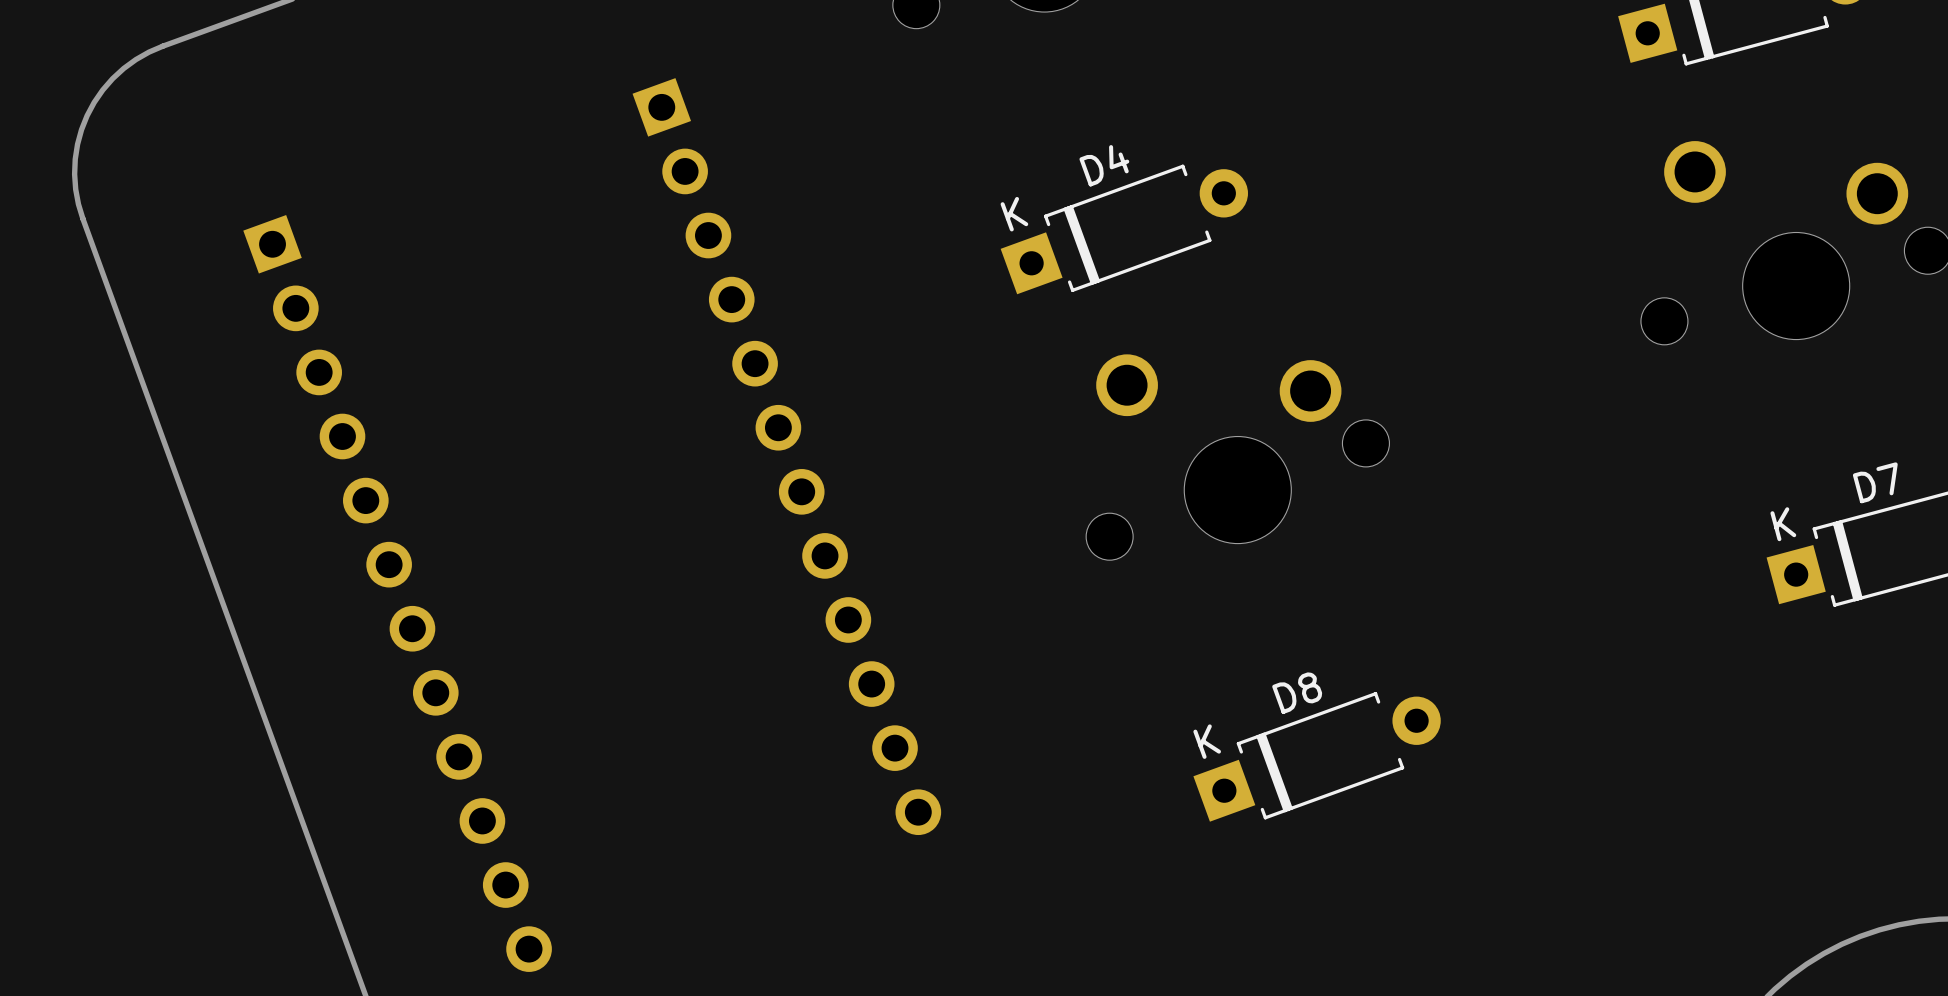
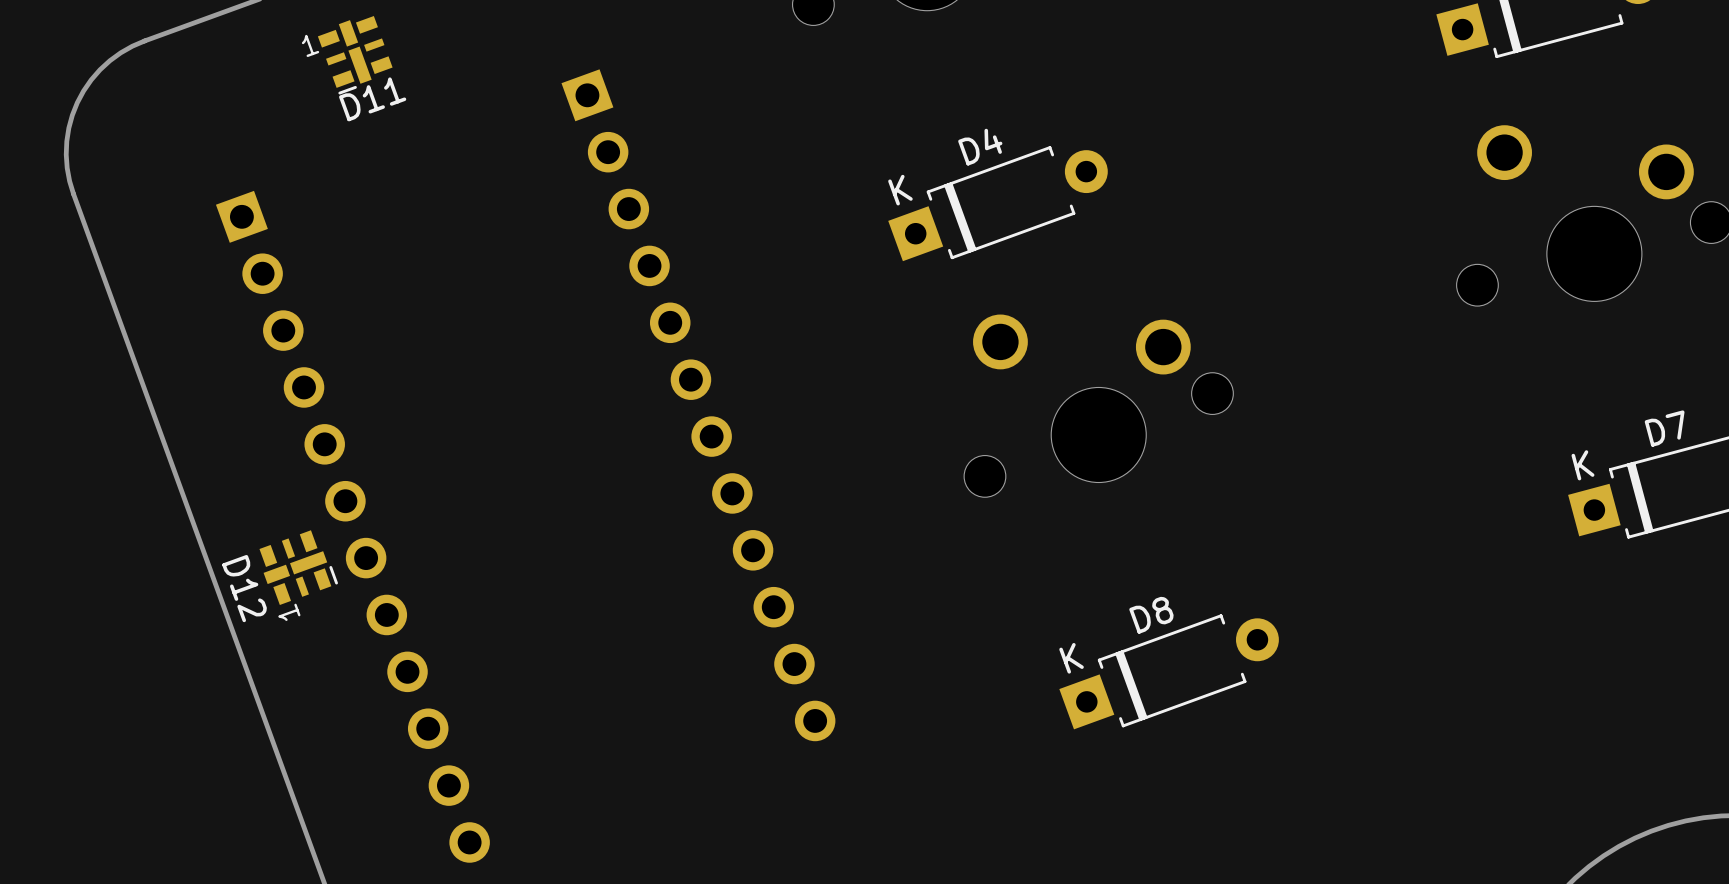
D11: none -> (355, 55)
D12: none -> (298, 567)

